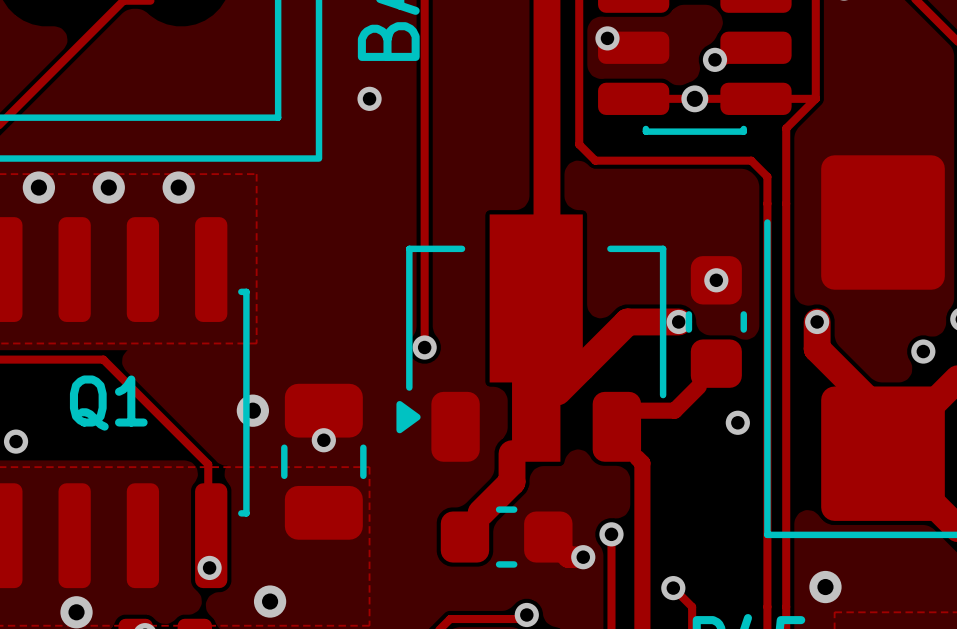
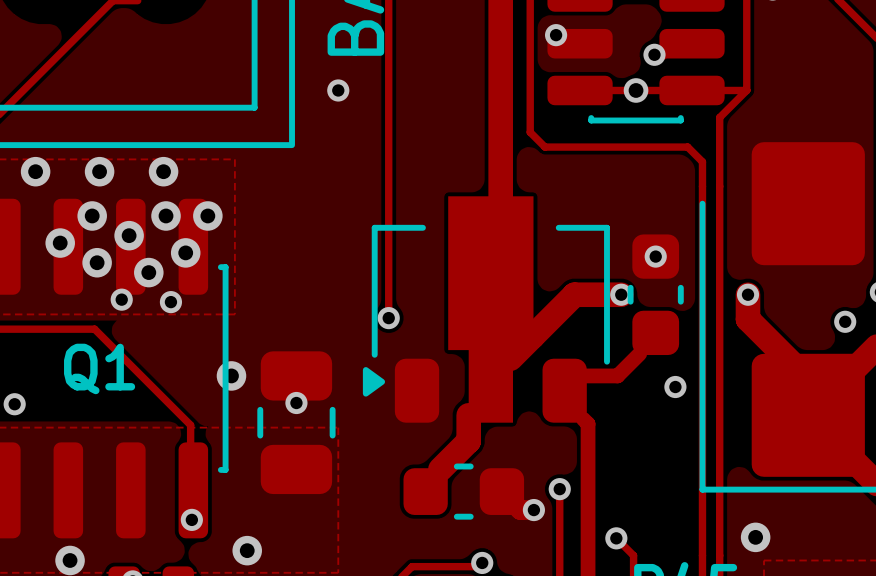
via: none -> (92, 215)
via: none -> (166, 215)
via: none -> (207, 215)
via: none -> (129, 235)
via: none -> (60, 243)
via: none -> (185, 252)
via: none -> (97, 262)
via: none -> (148, 272)
via: none -> (121, 299)
via: none -> (170, 302)

